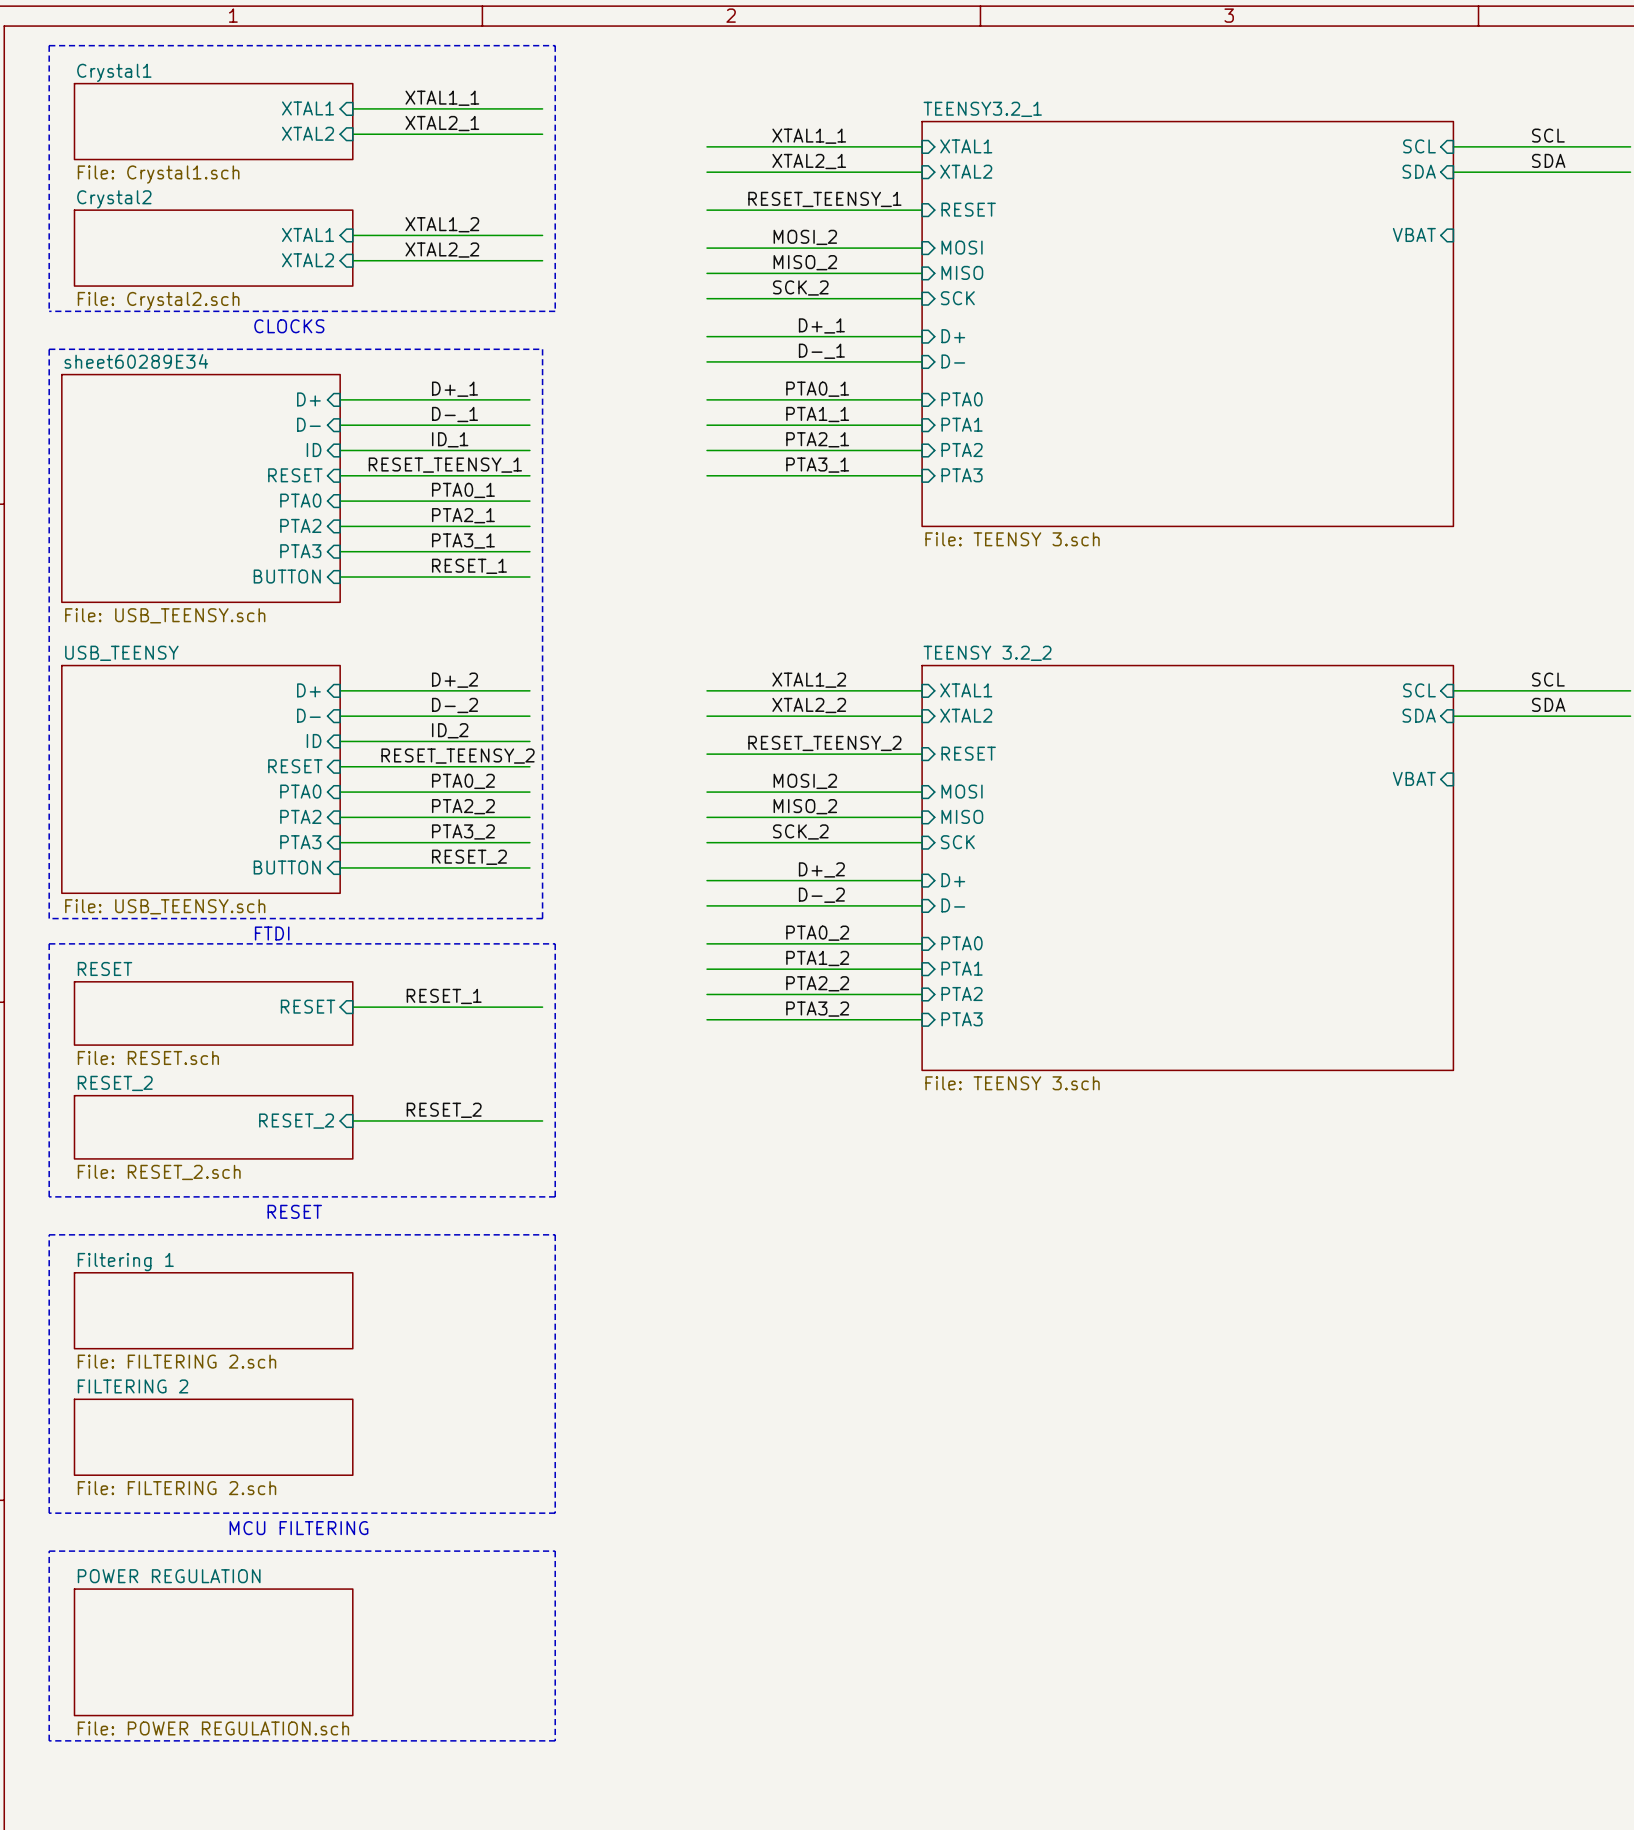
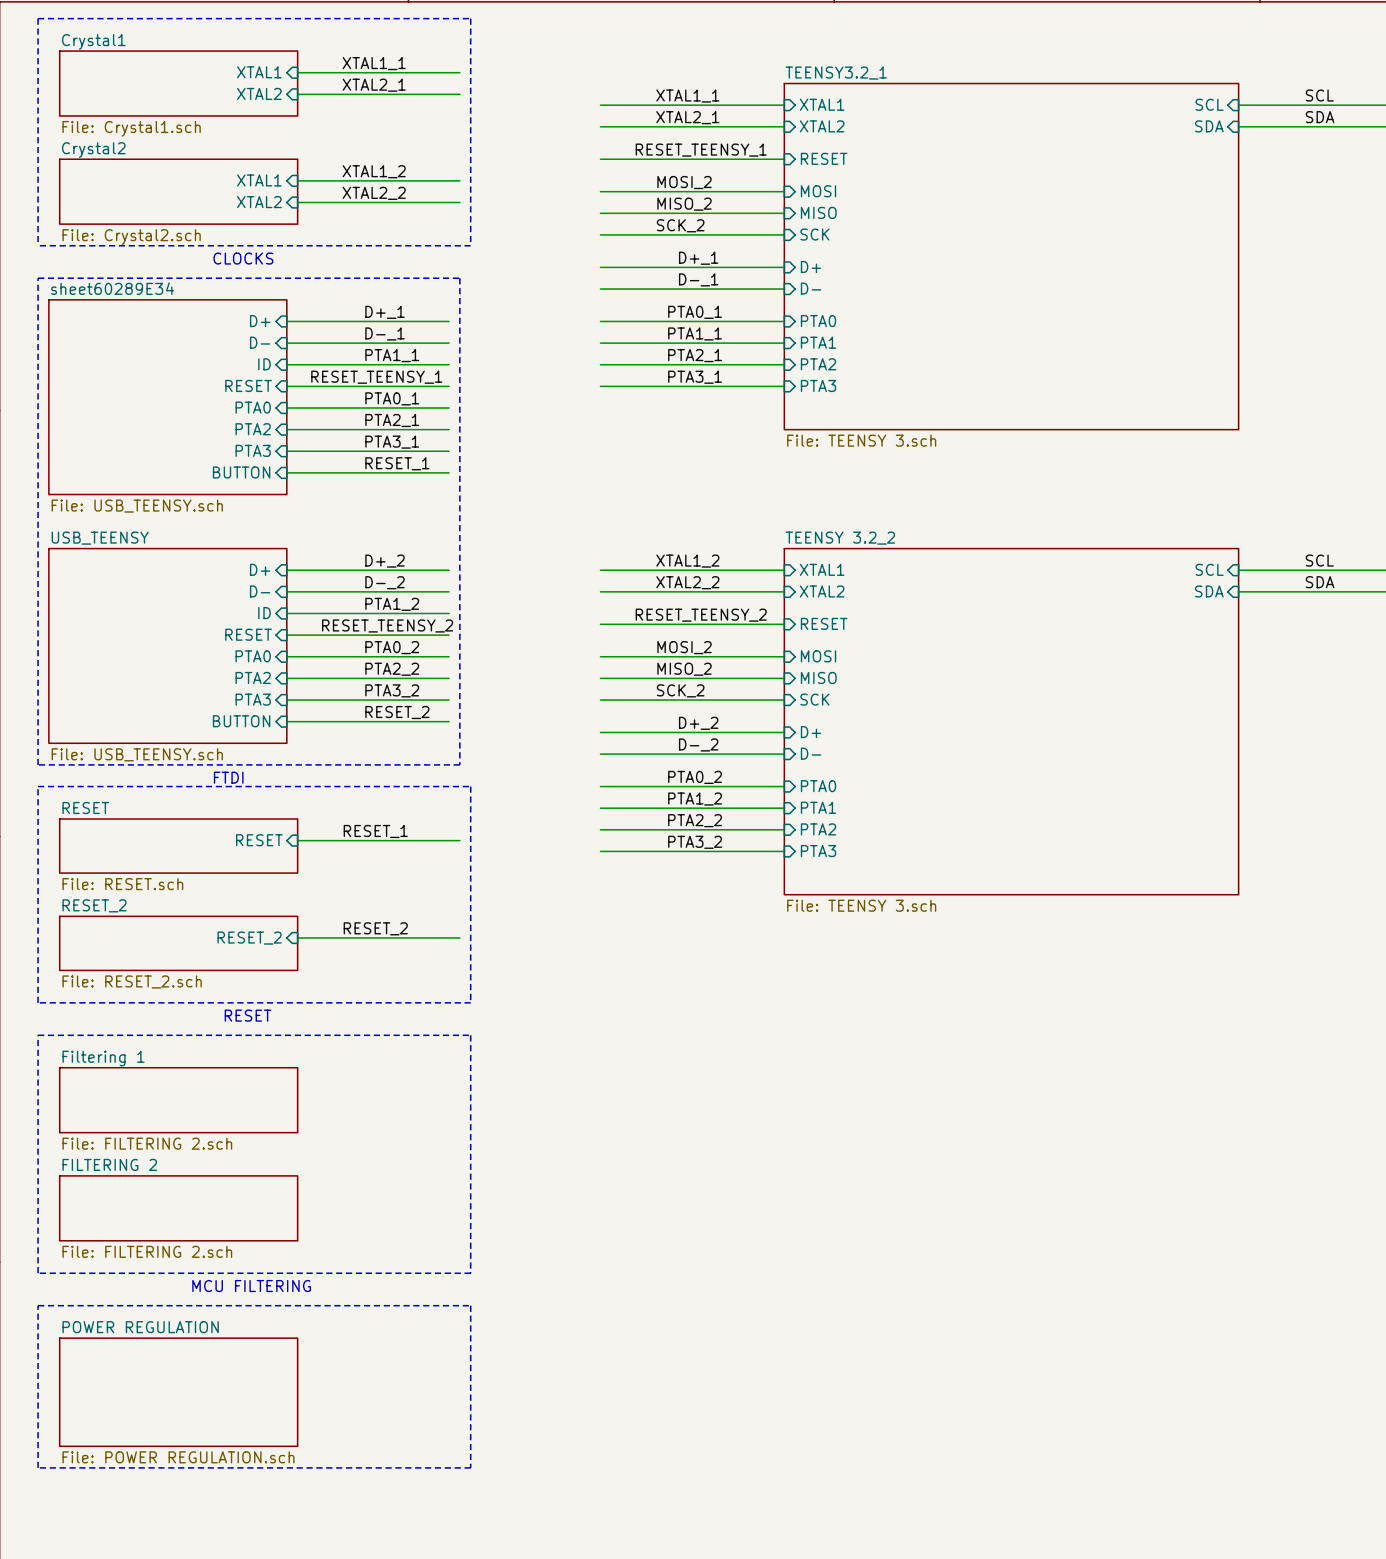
sheet pin: VBAT (1414, 234) -> none
label: ID_1 (450, 439) -> PTA1_1 (392, 355)
label: ID_2 (450, 730) -> PTA1_2 (392, 604)
sheet pin: VBAT (1414, 778) -> none

